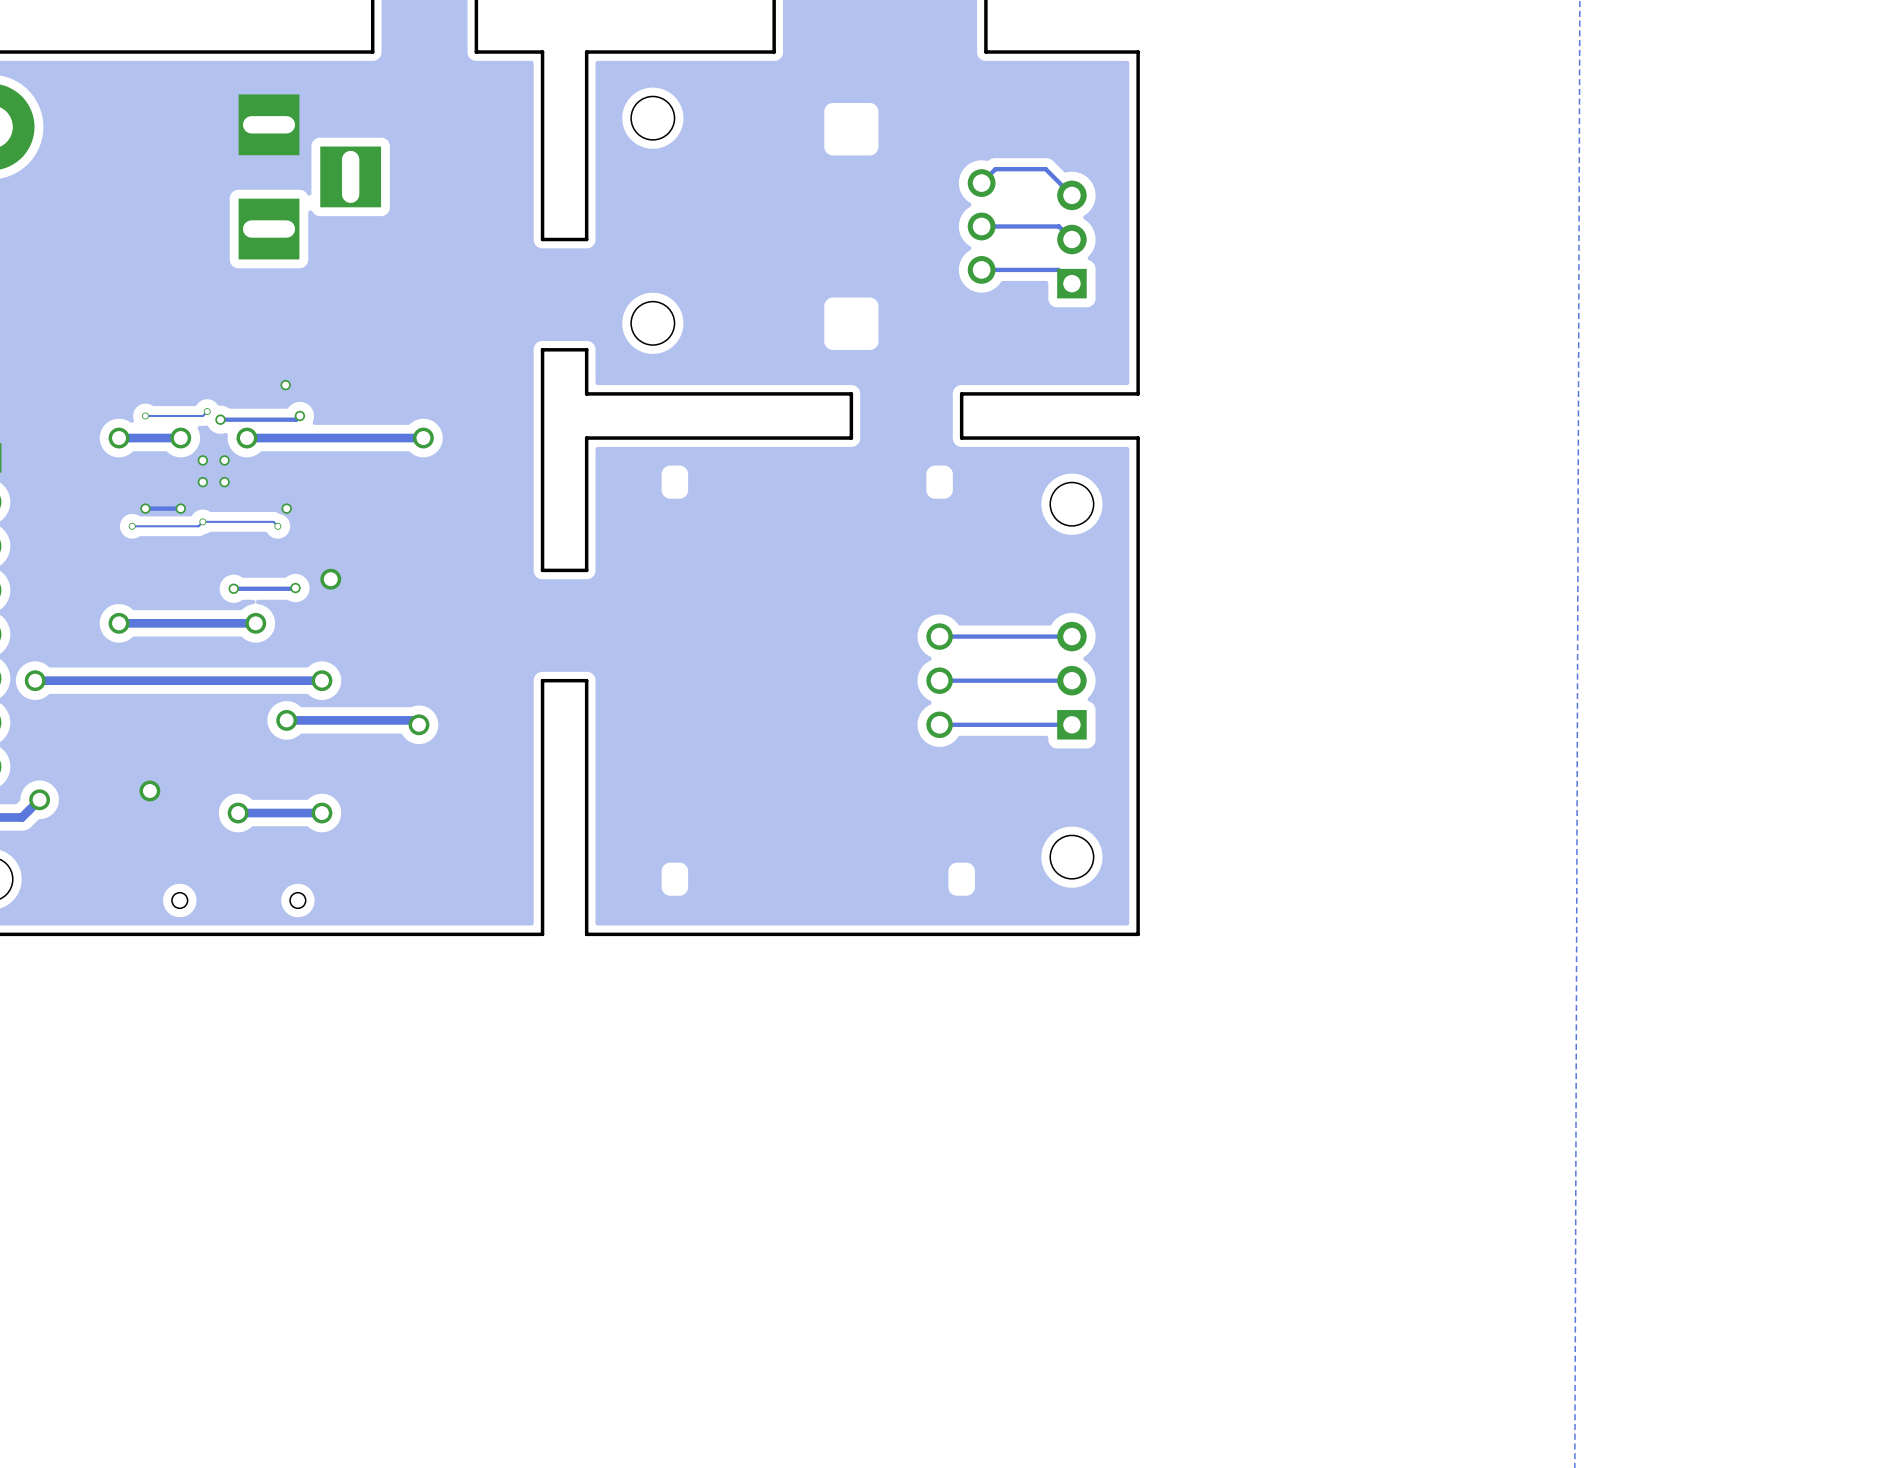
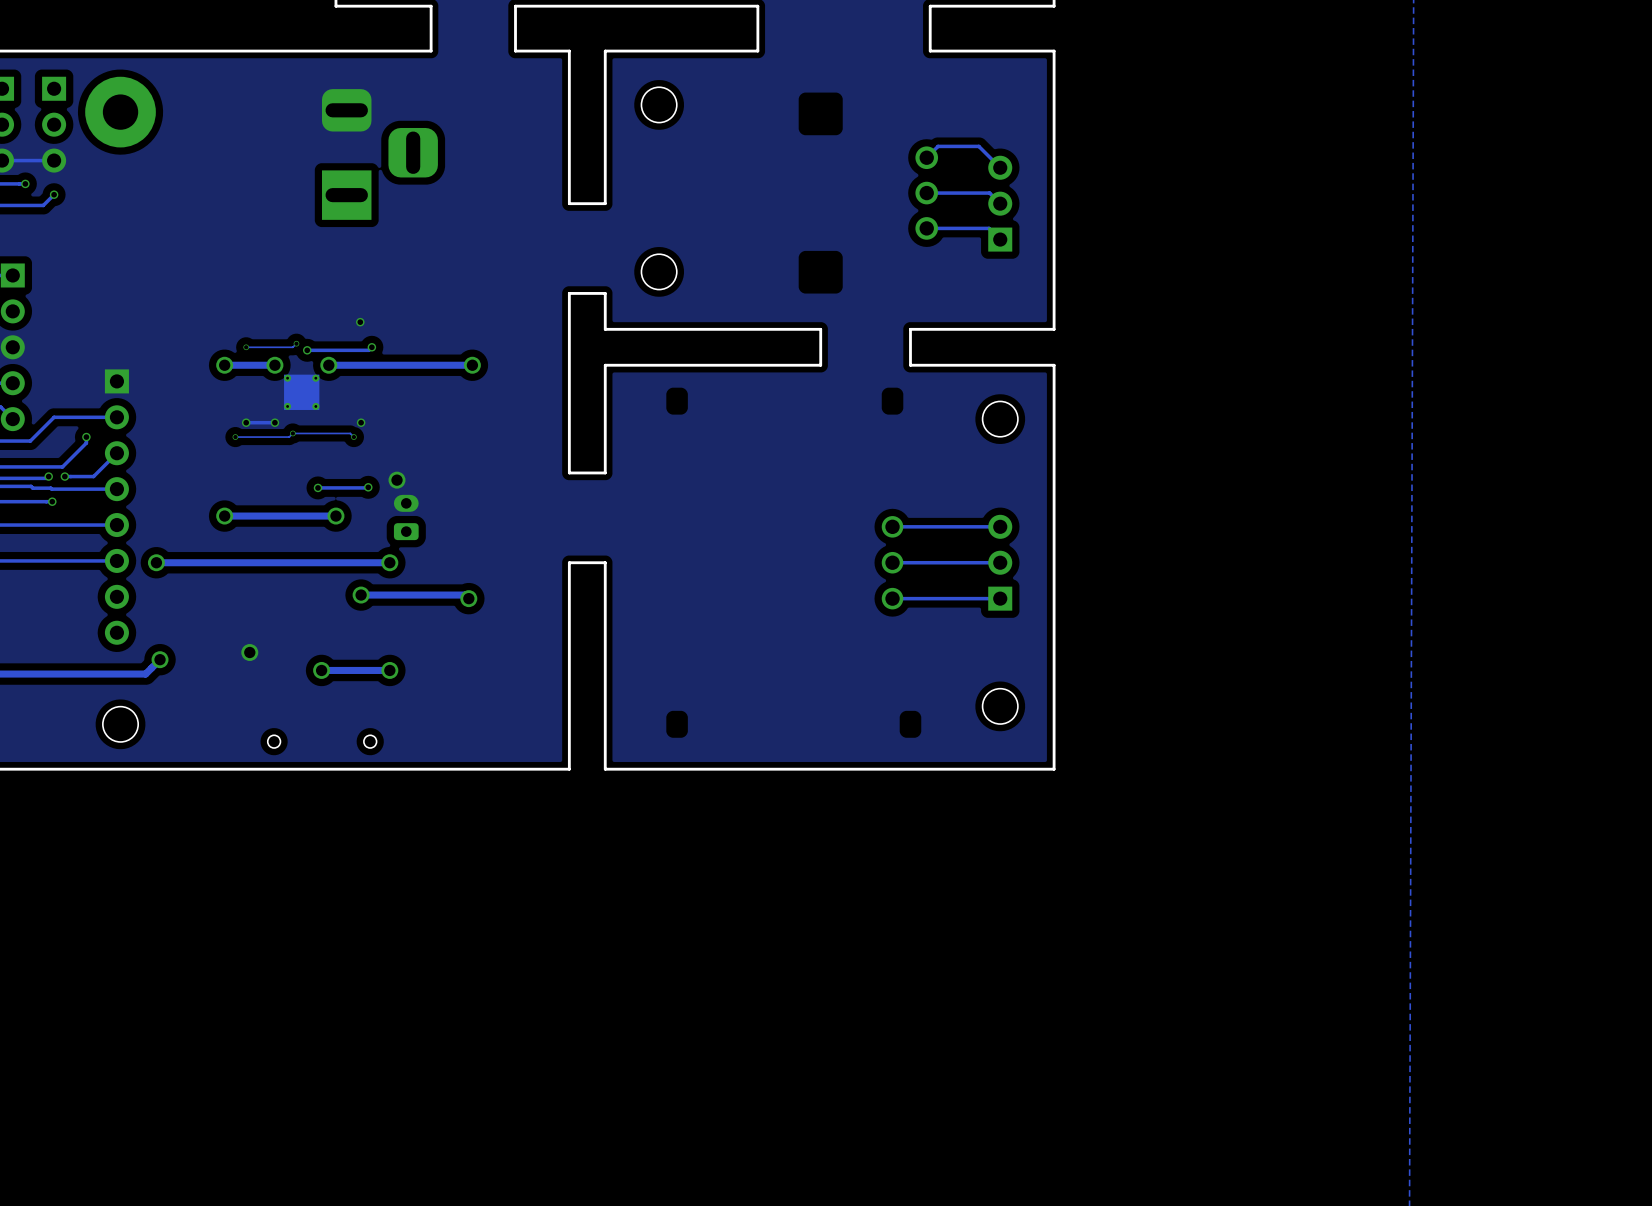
part footprint: [238, 94, 382, 260] -> [322, 89, 438, 220]
via: (202, 460) -> none
via: (224, 460) -> none
part: none -> (301, 392)
via: (202, 482) -> none
via: (224, 482) -> none
part: none -> (406, 517)

